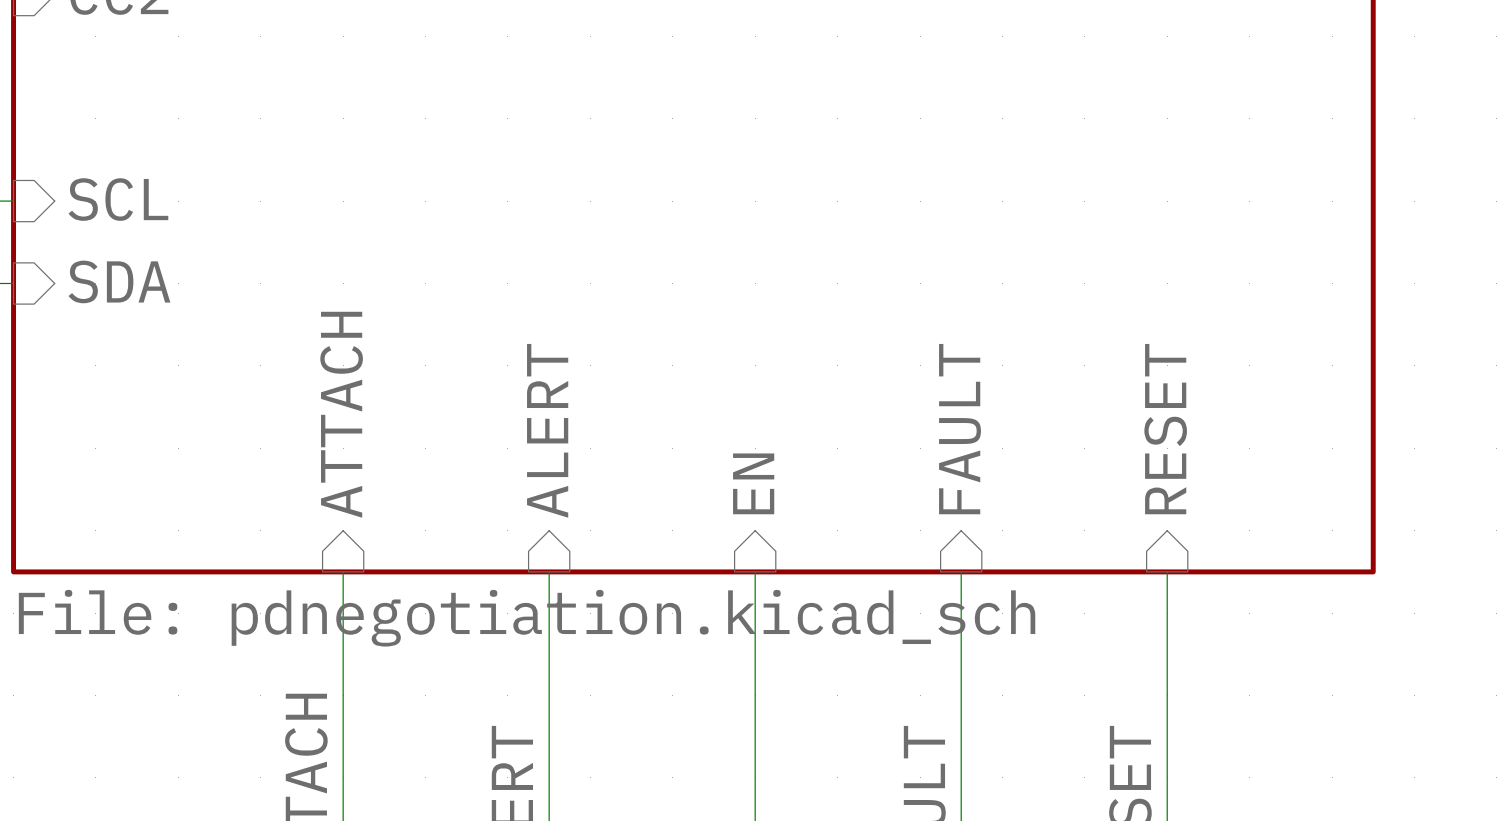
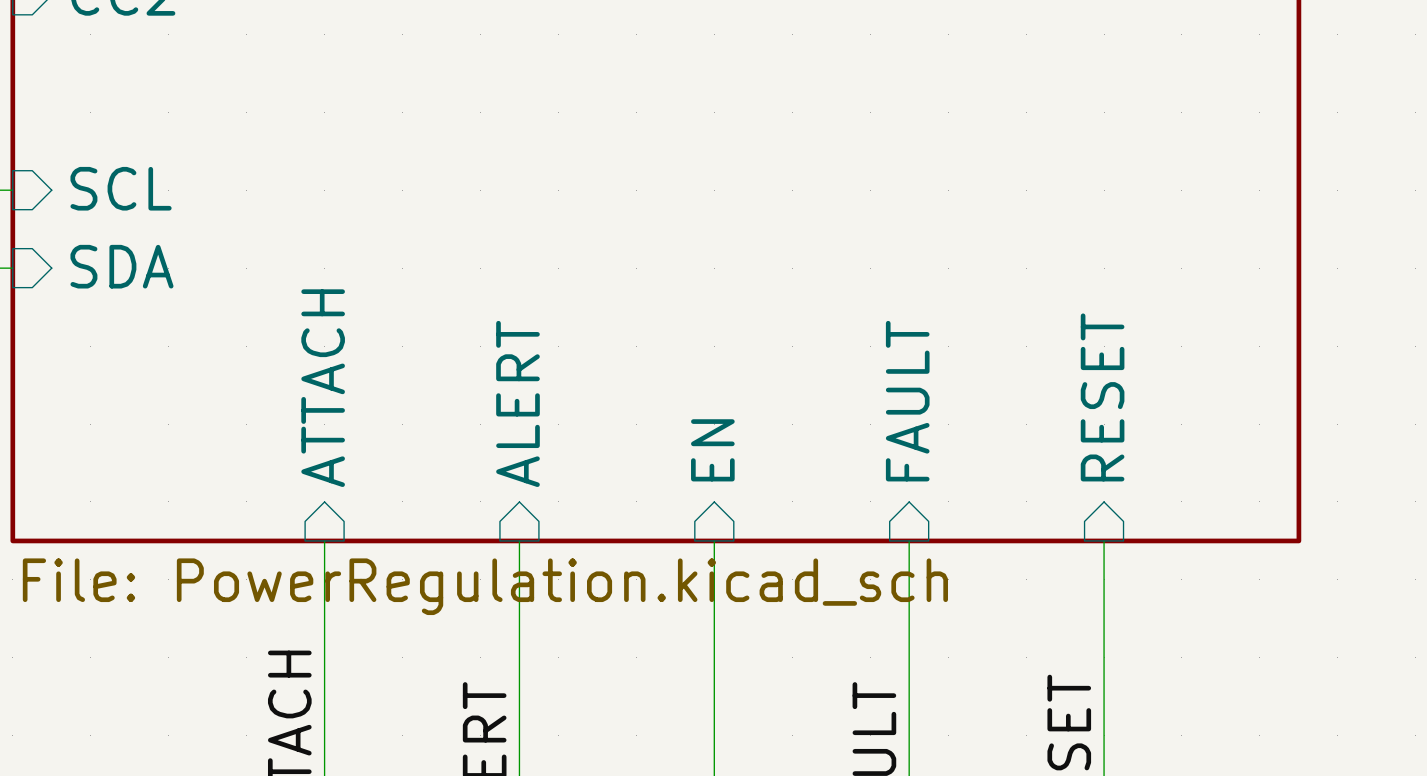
sheet value: File: pdnegotiation.kicad_sch (527, 618) -> File: PowerRegulation.kicad_sch (485, 586)

